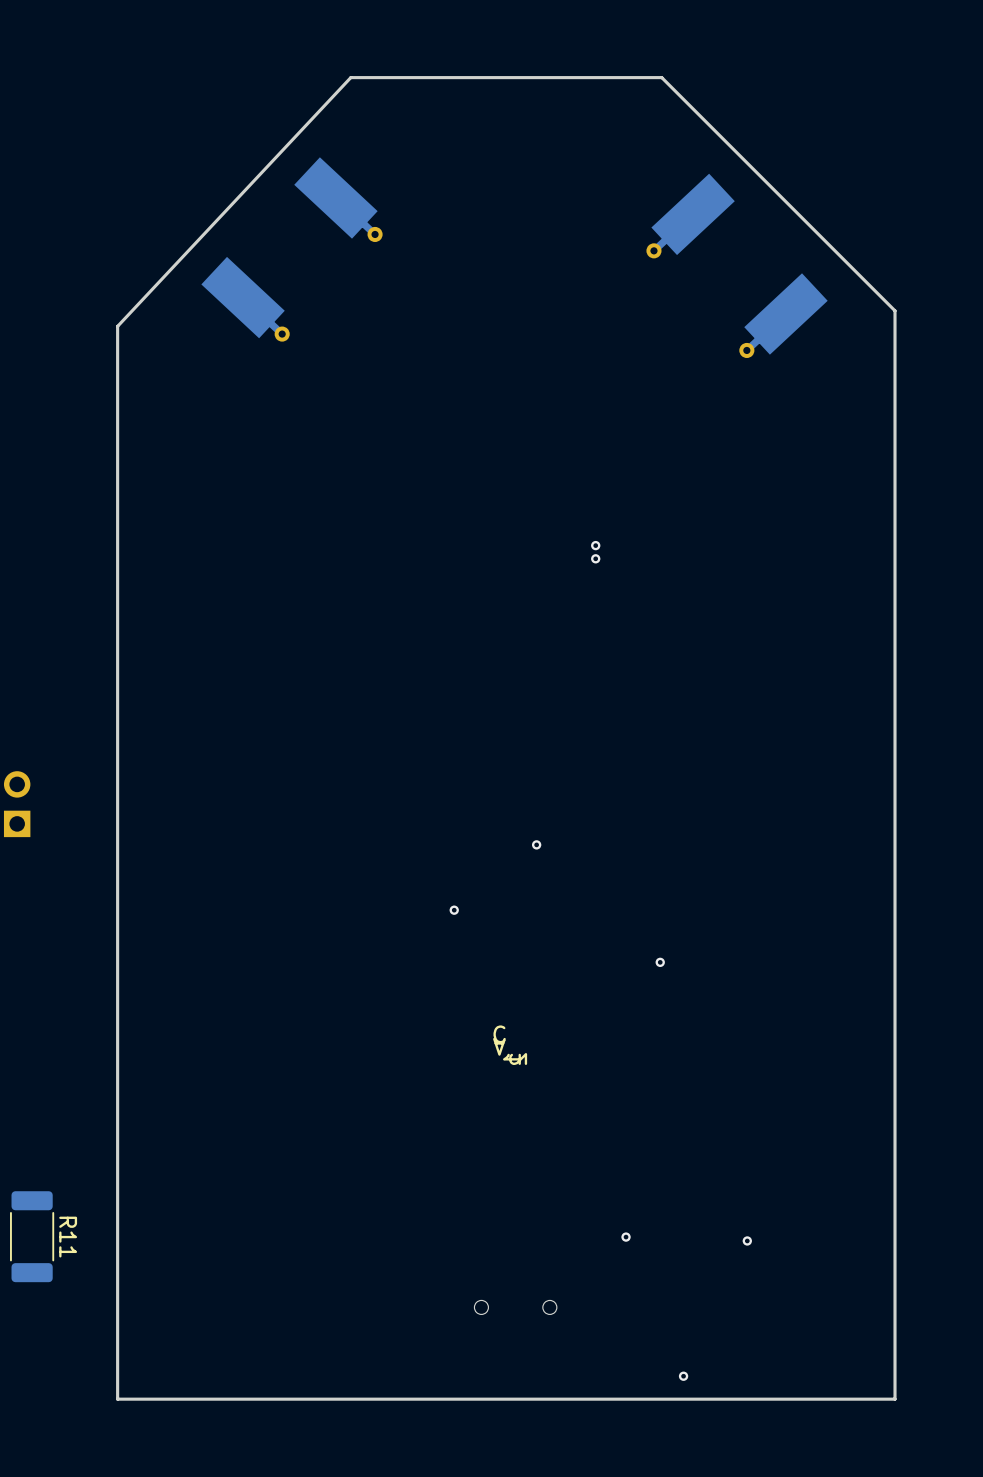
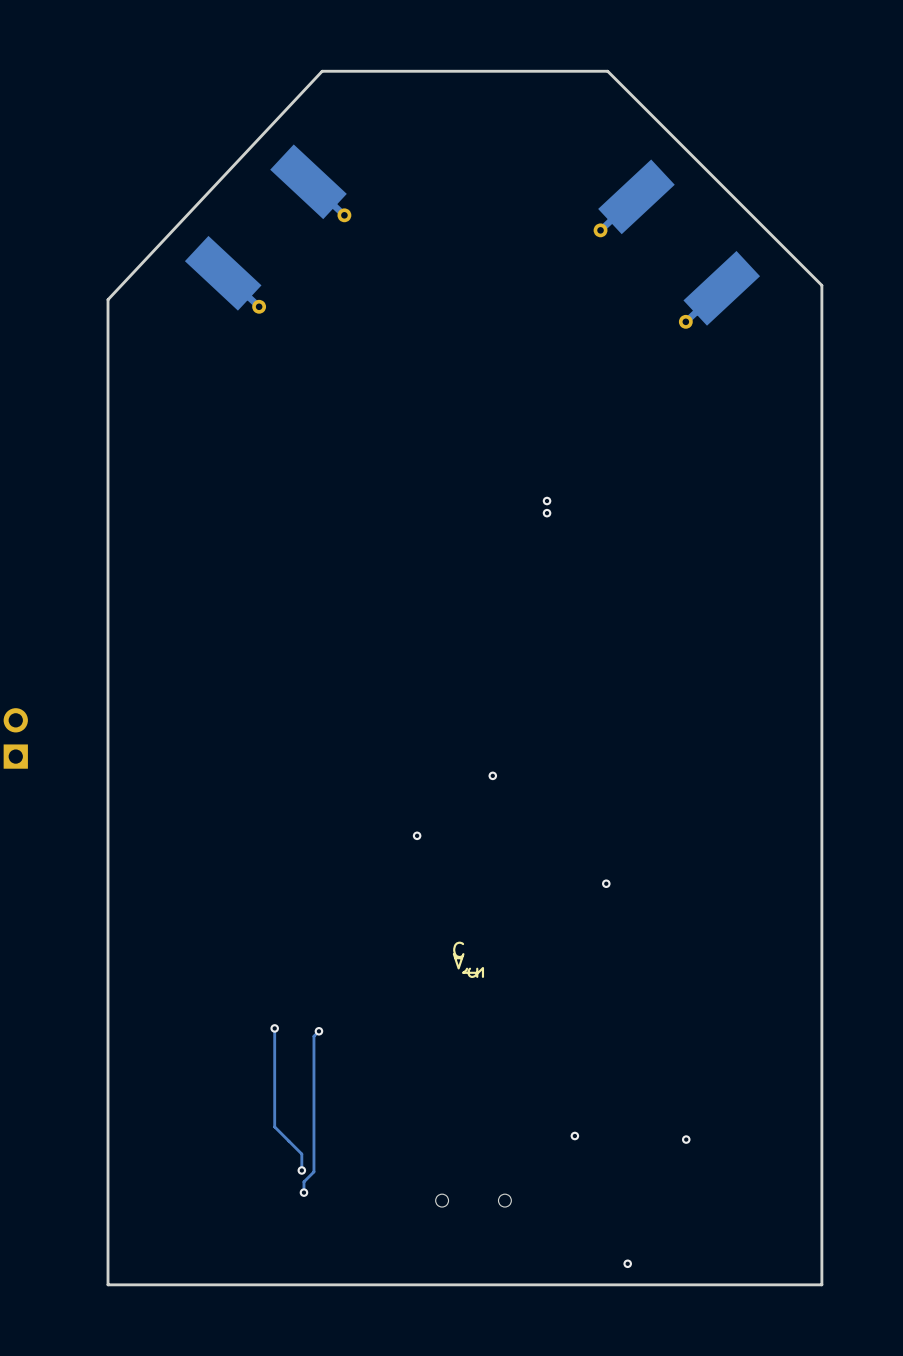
track: none -> (274, 1028) (274, 1126) (301, 1154) (301, 1170)
via: none -> (274, 1028)
track: none -> (318, 1031) (313, 1036) (313, 1171) (303, 1181) (303, 1192)
via: none -> (318, 1031)
R11: (32, 1236) -> none
via: none -> (301, 1170)
via: none -> (303, 1192)

